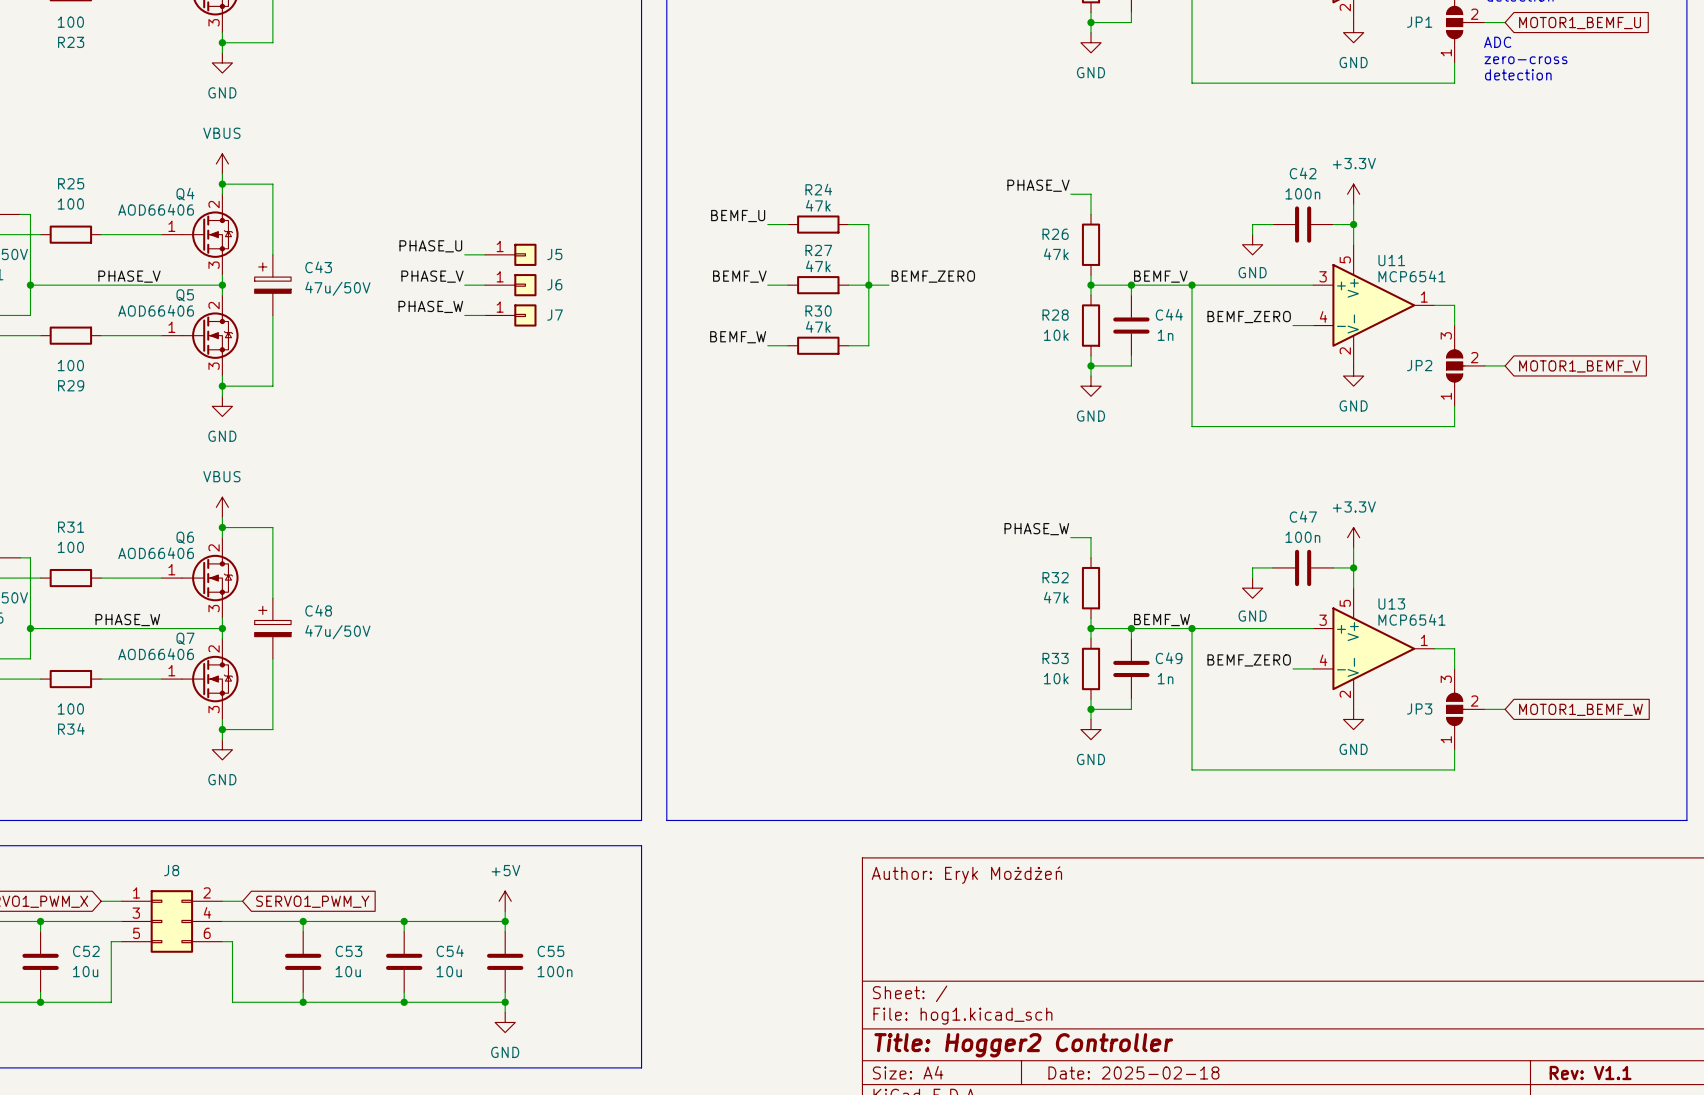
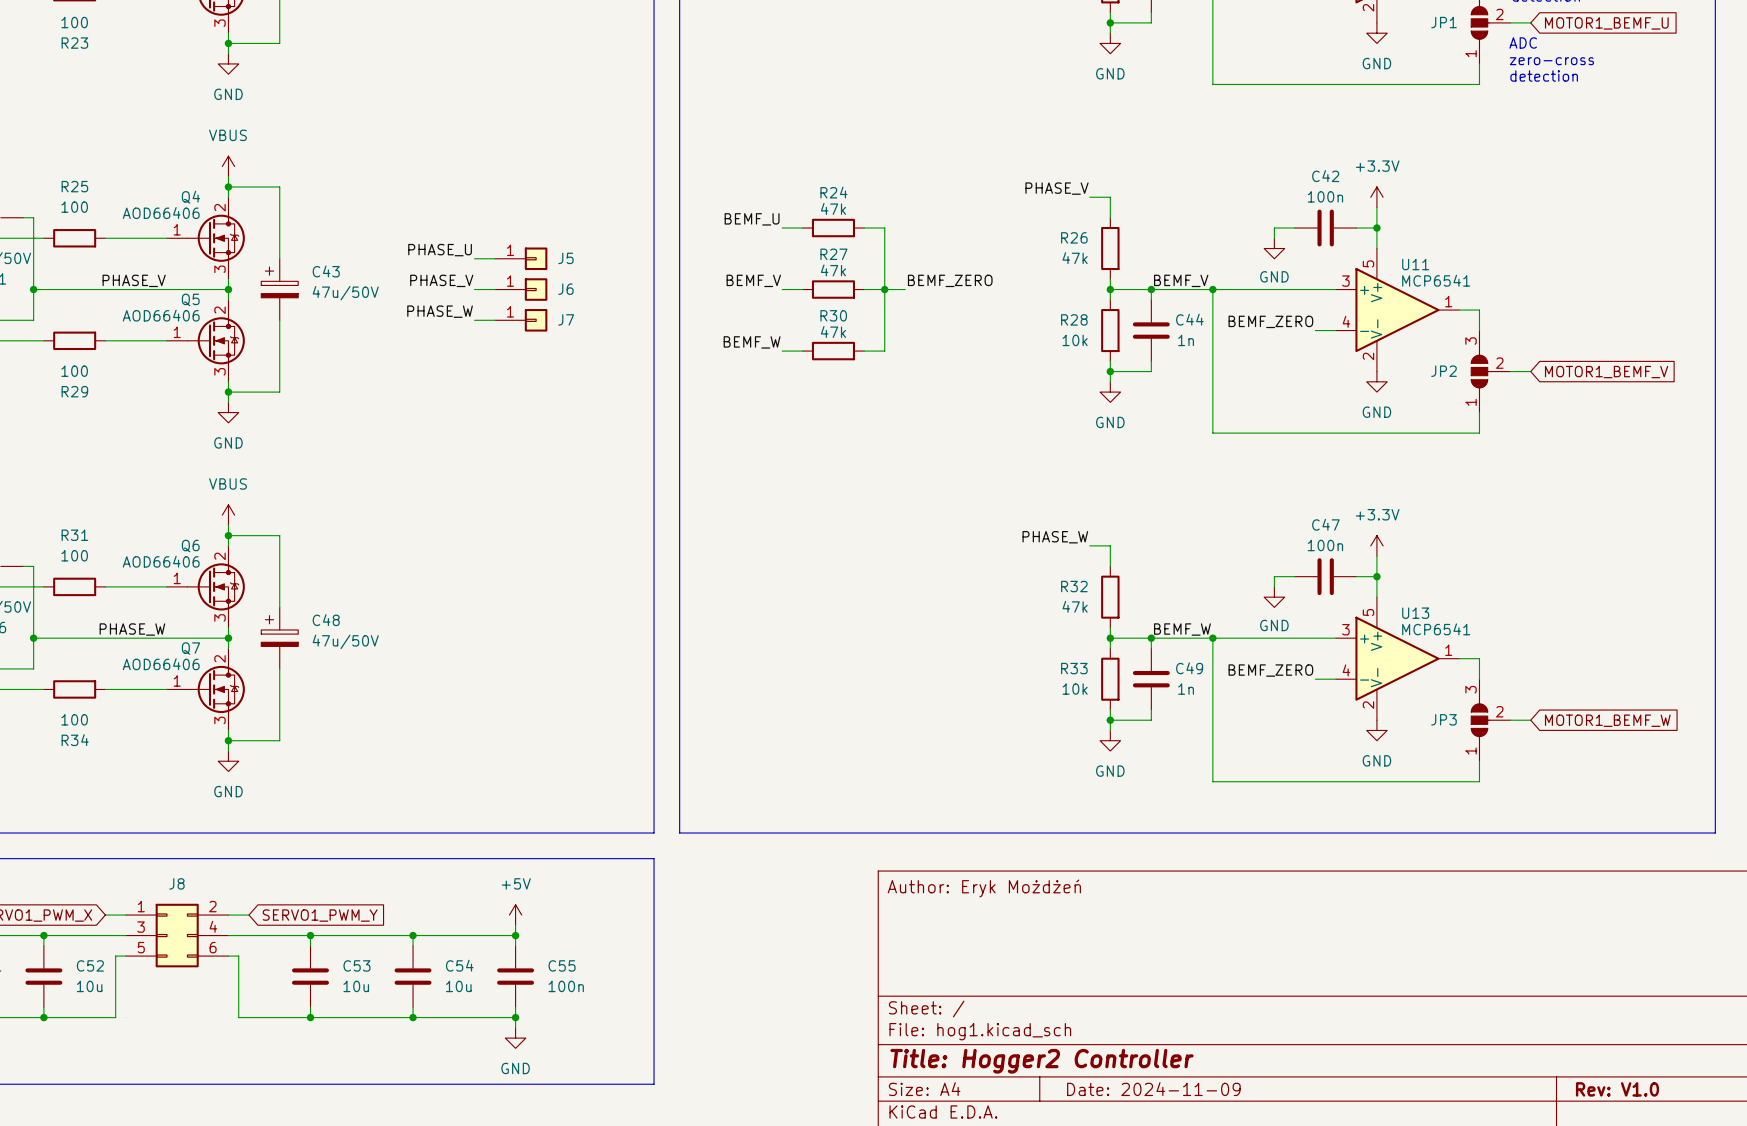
title block: Date: 2025-02-18 (1133, 1073) -> Date: 2024-11-09 (1153, 1089)
title block: Rev: V1.1 (1590, 1073) -> Rev: V1.0 (1617, 1089)

